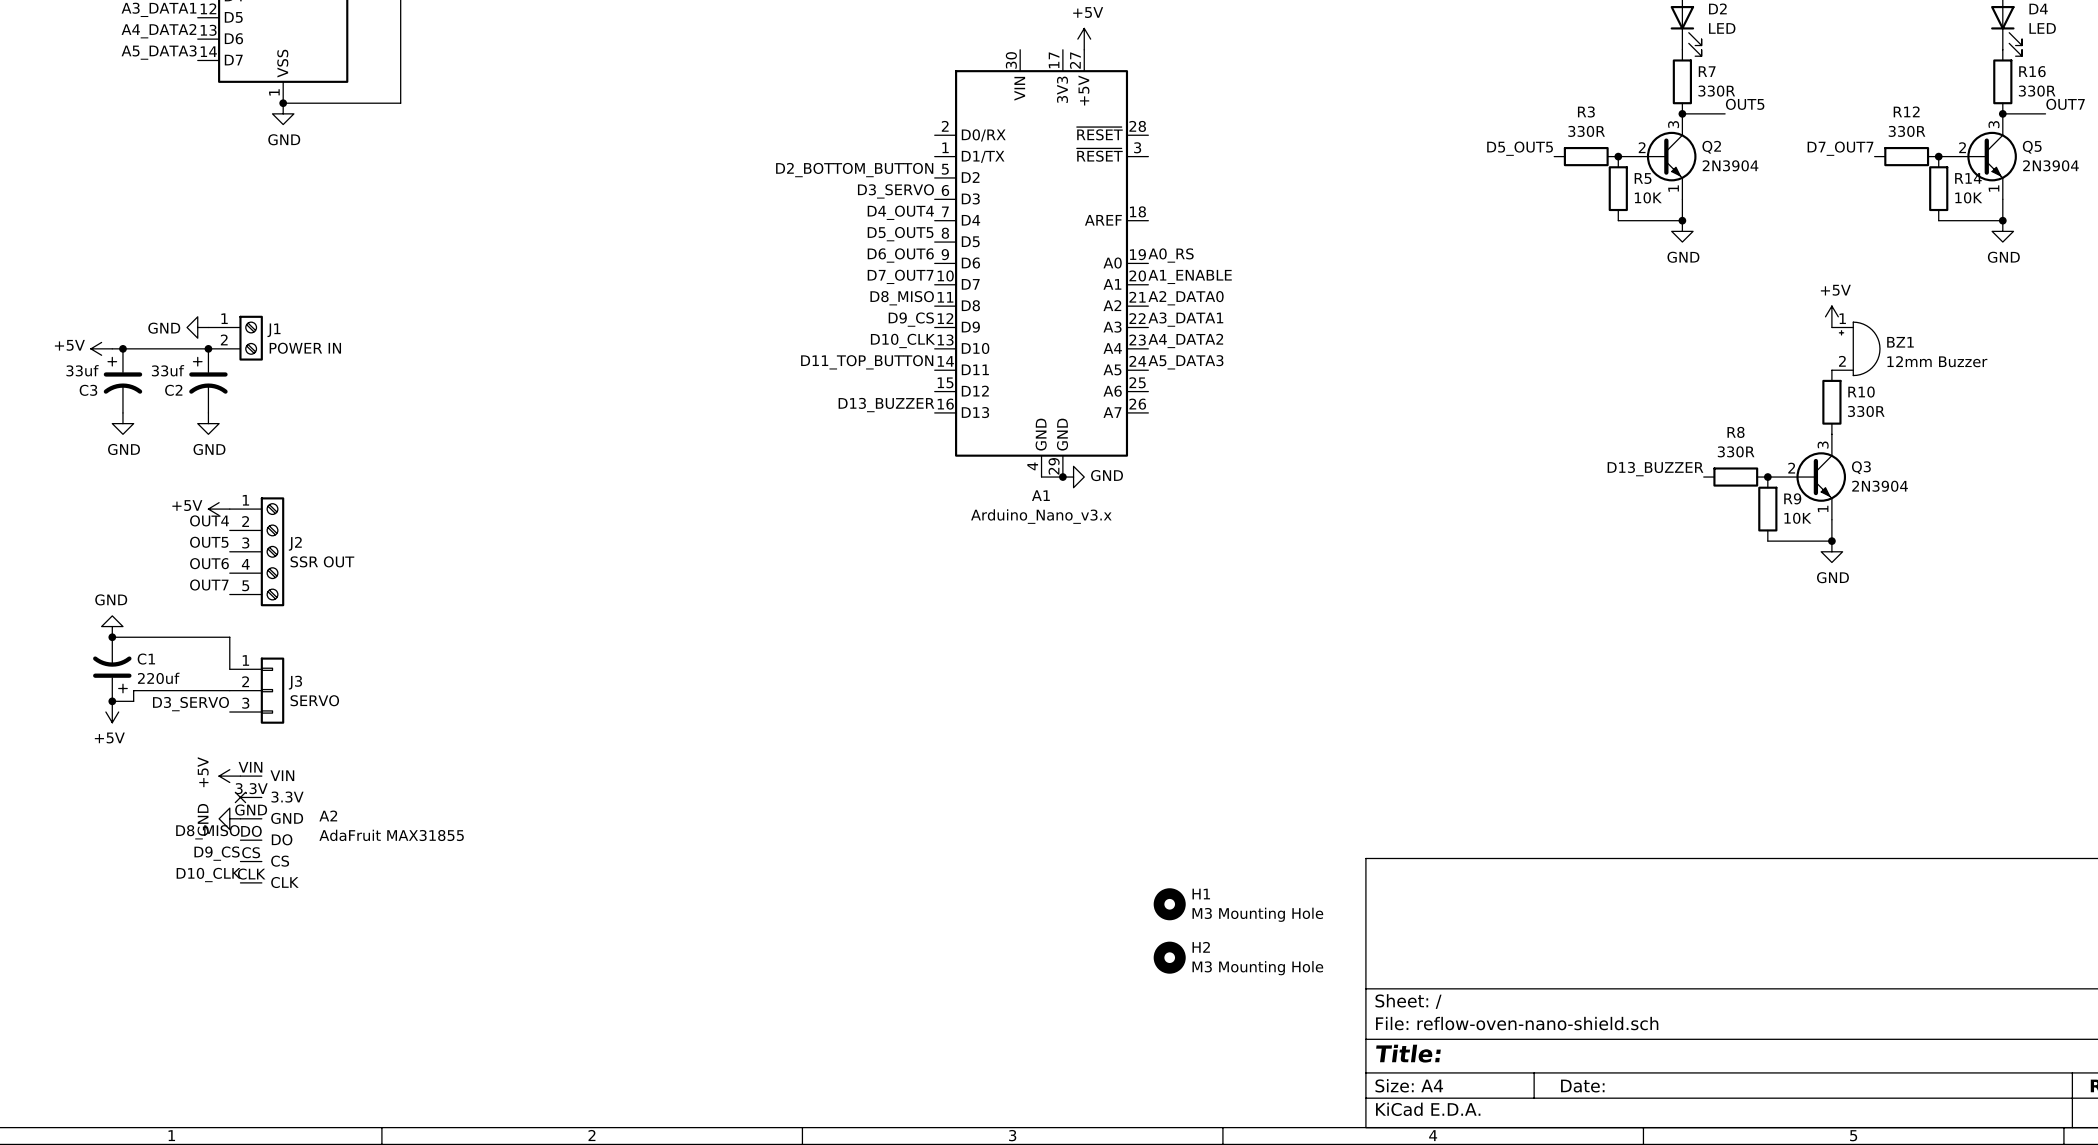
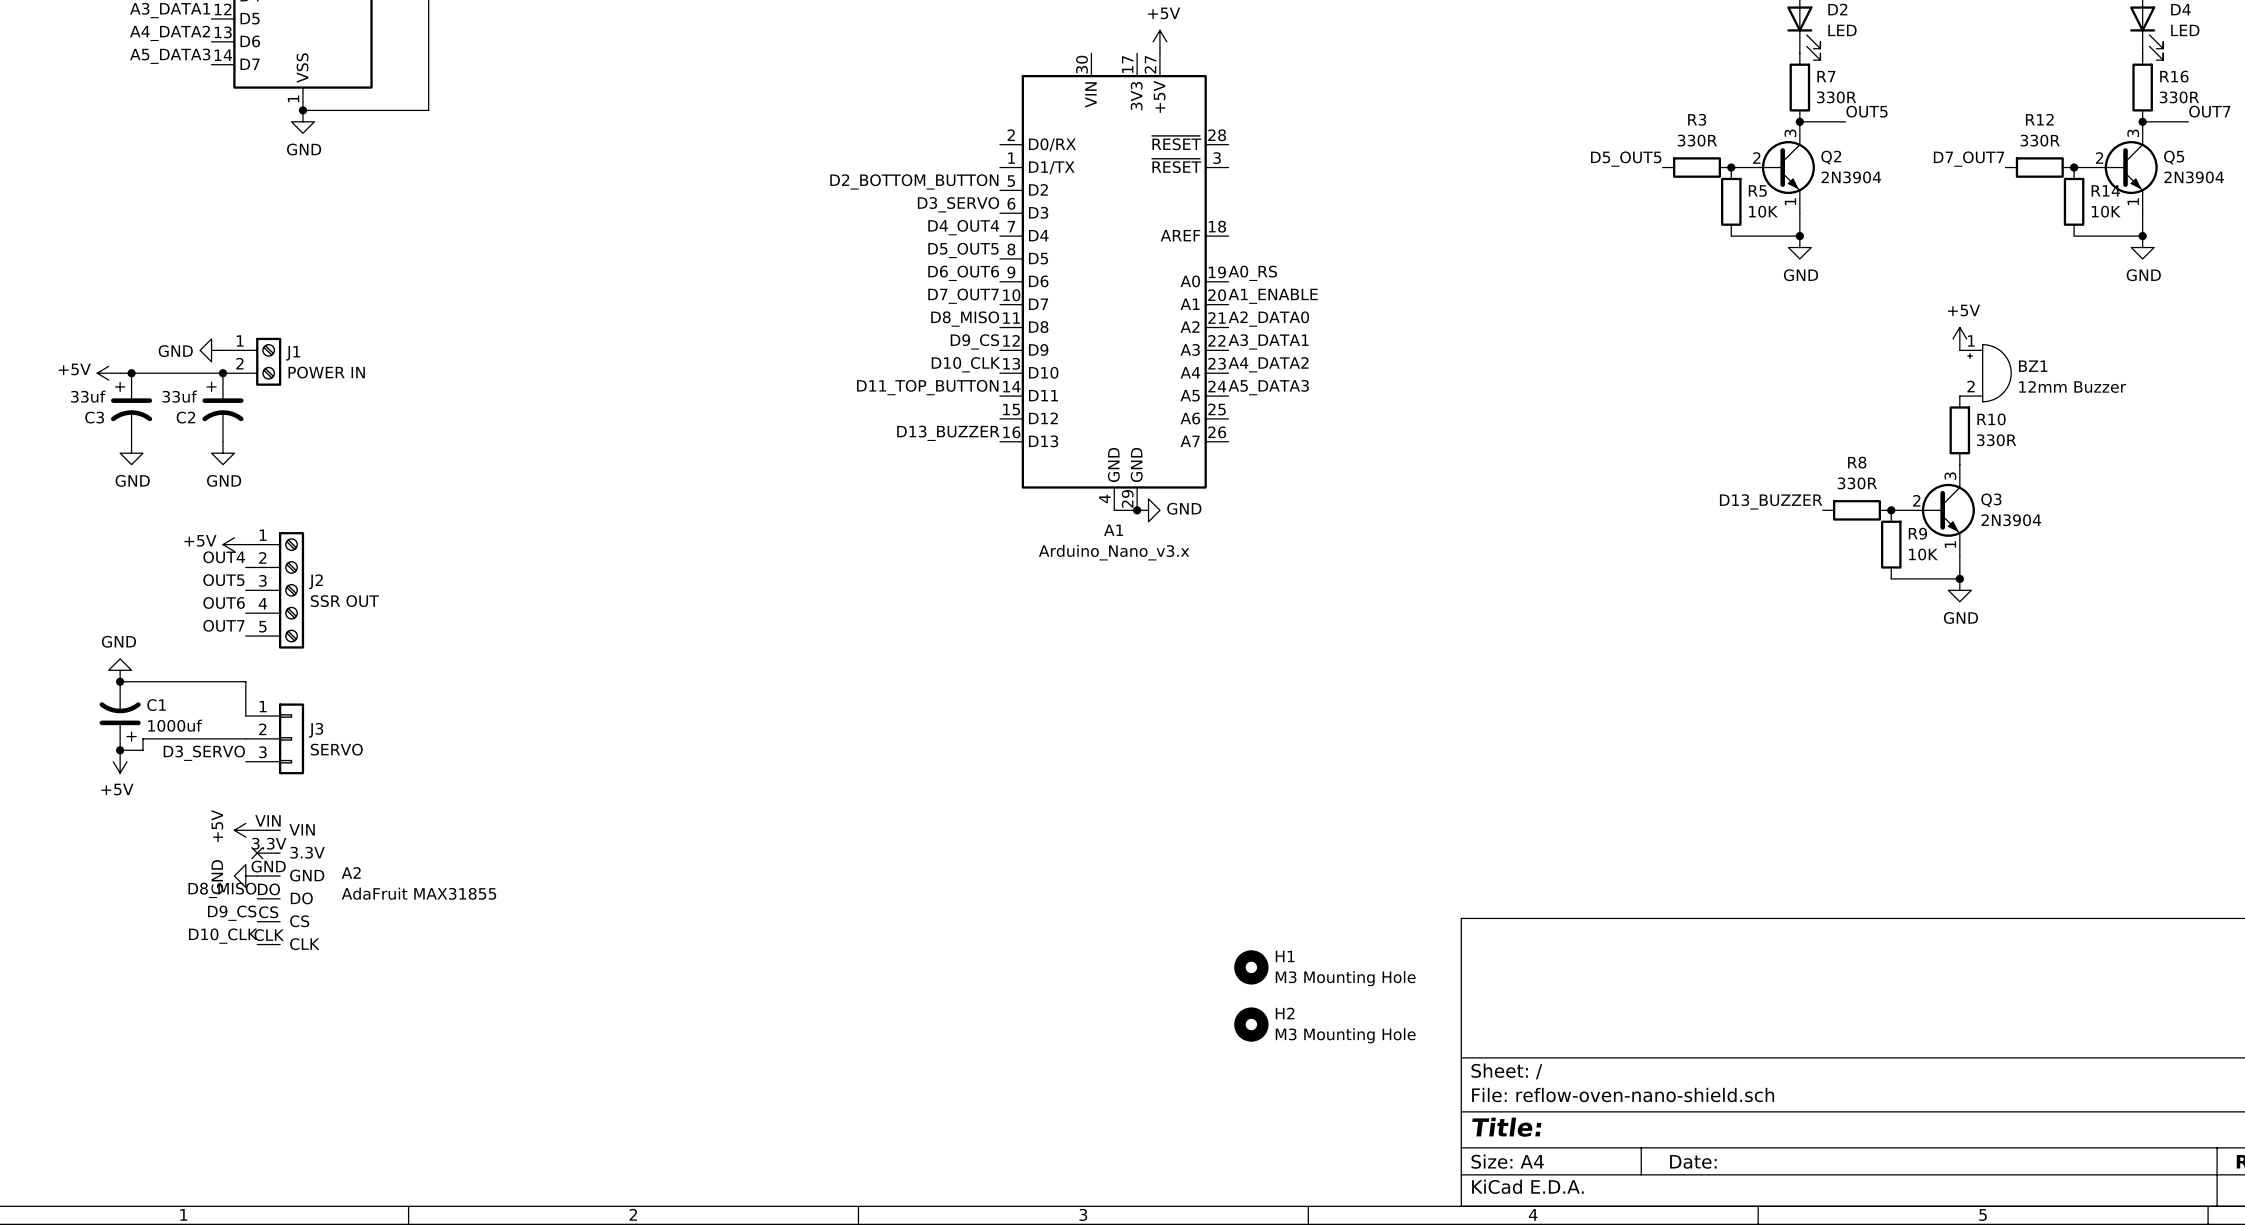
C1 value: 220uf (158, 678) -> 1000uf (175, 725)

